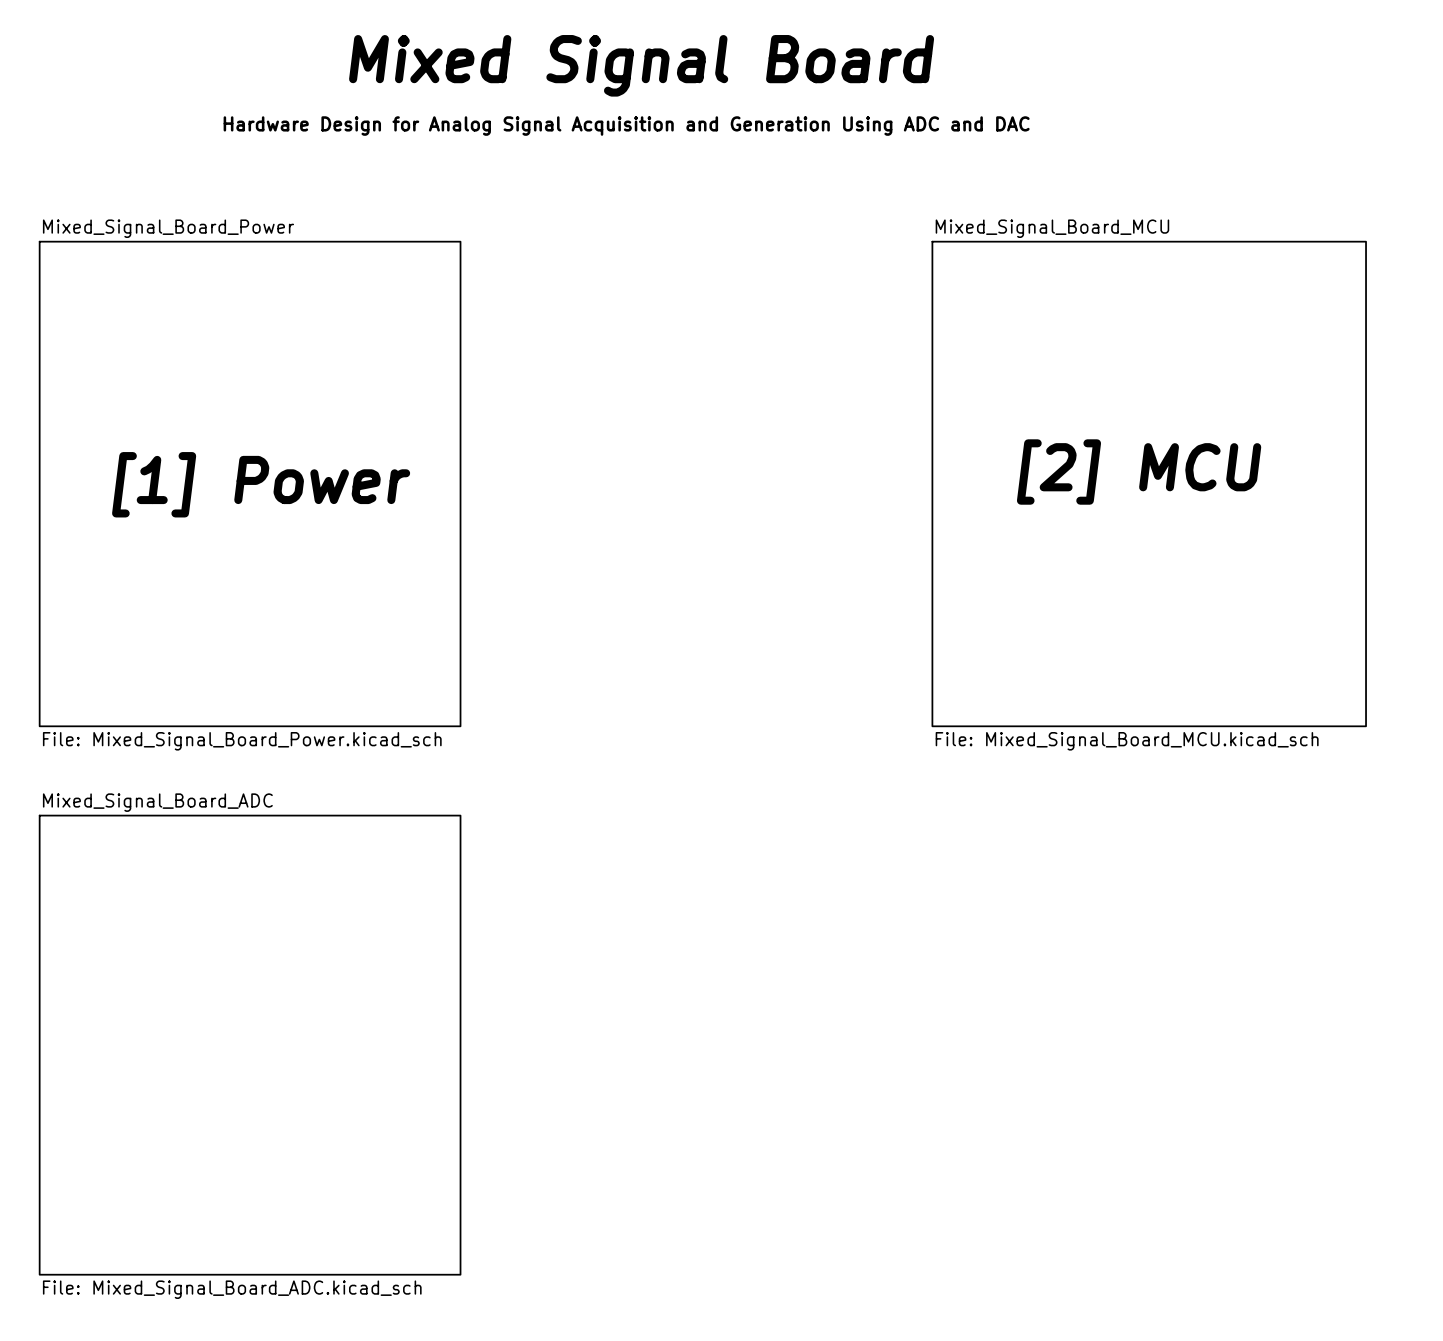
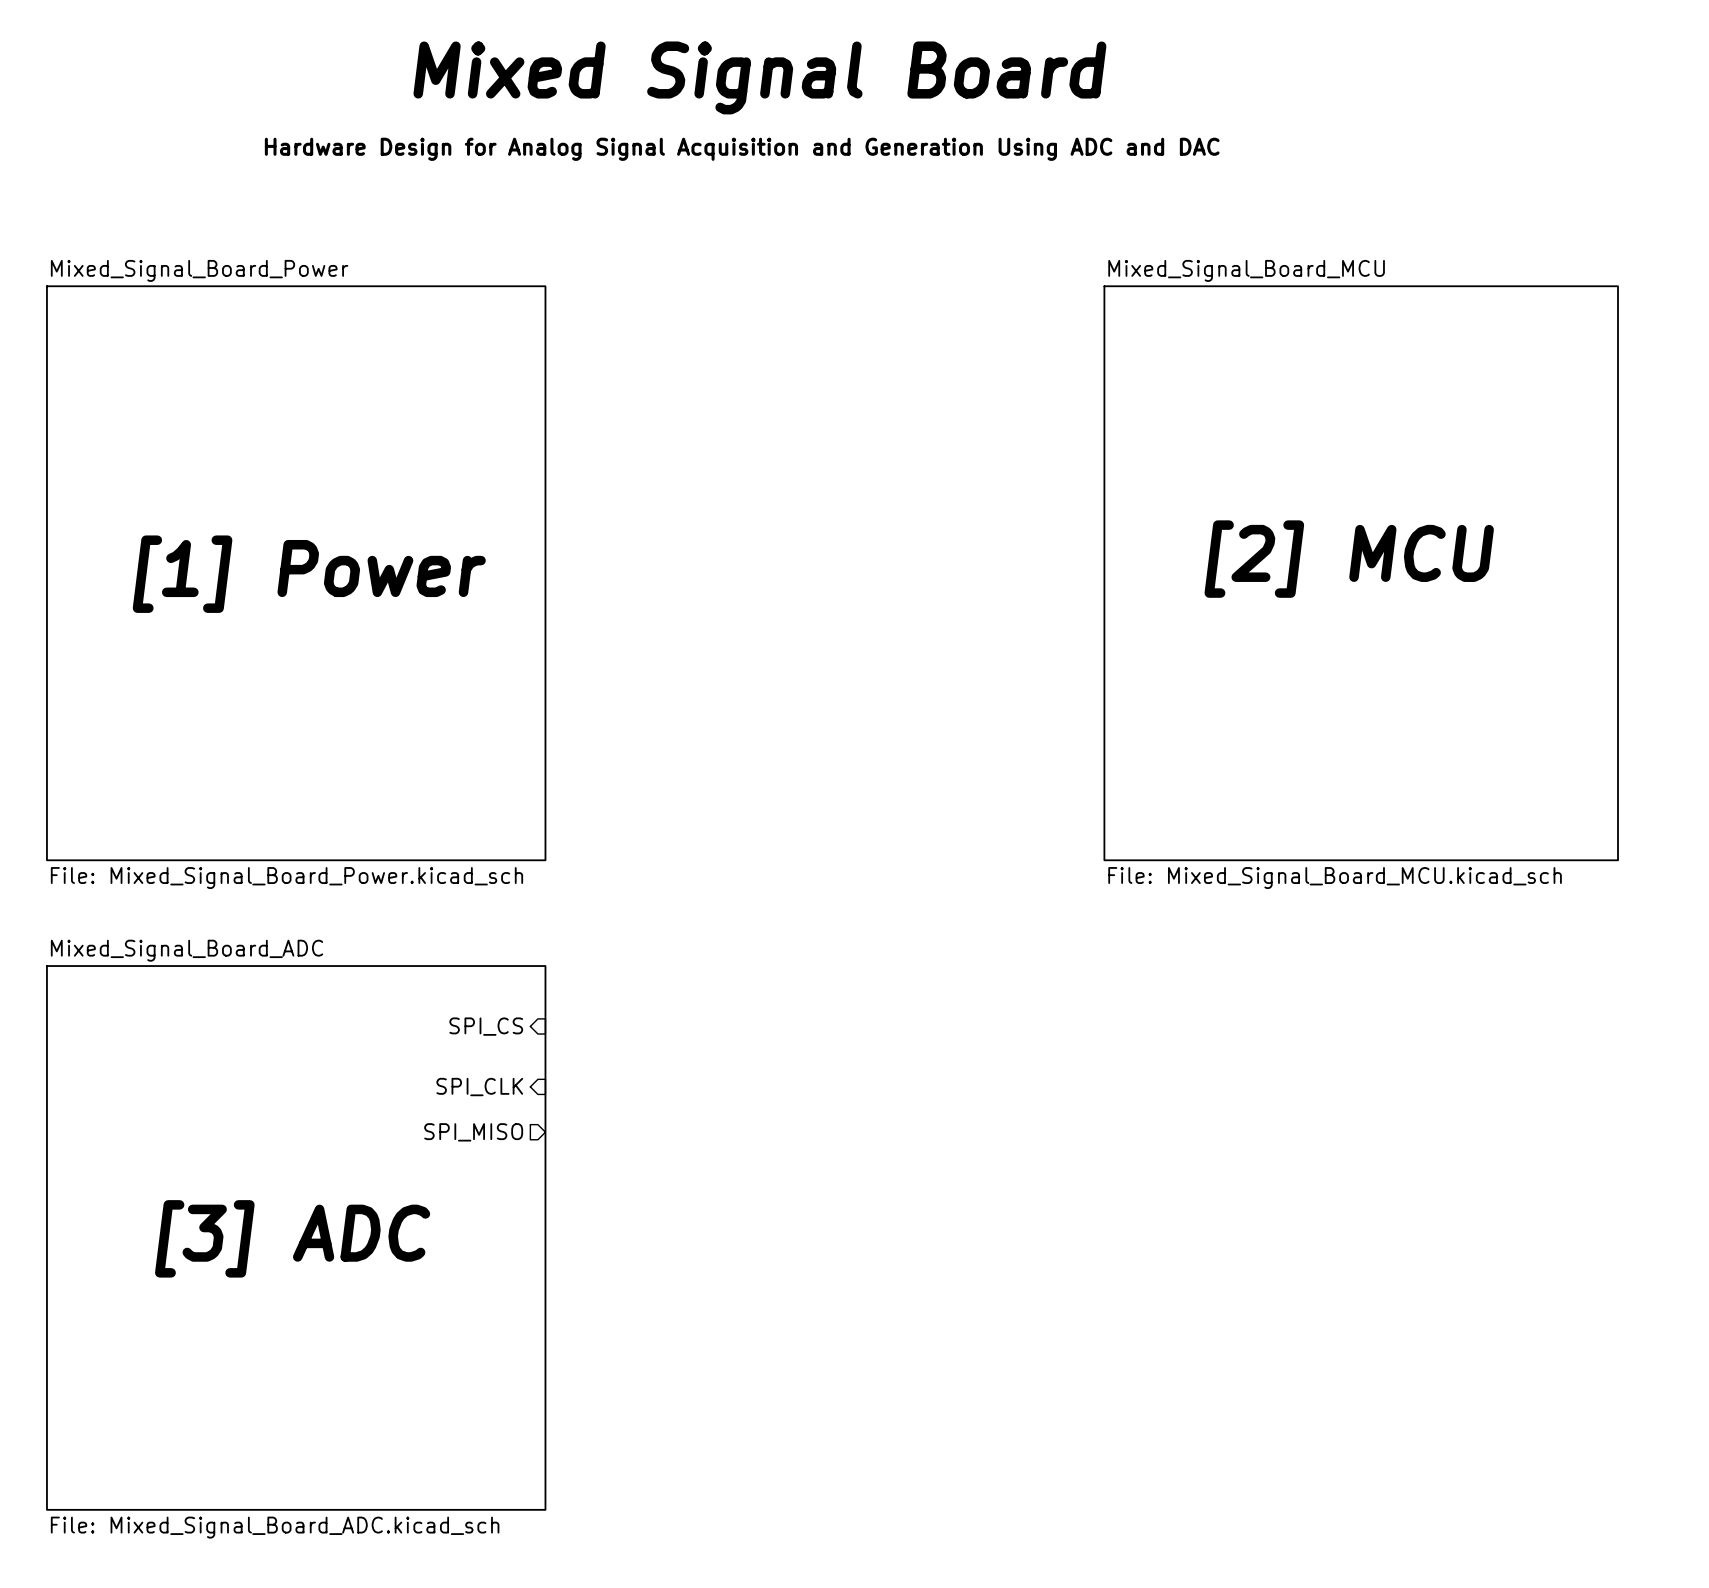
sheet pin: none -> SPI_CS (486, 1026)
sheet pin: none -> SPI_CLK (479, 1087)
sheet pin: none -> SPI_MISO (473, 1132)
text: none -> [3] ADC (292, 1238)

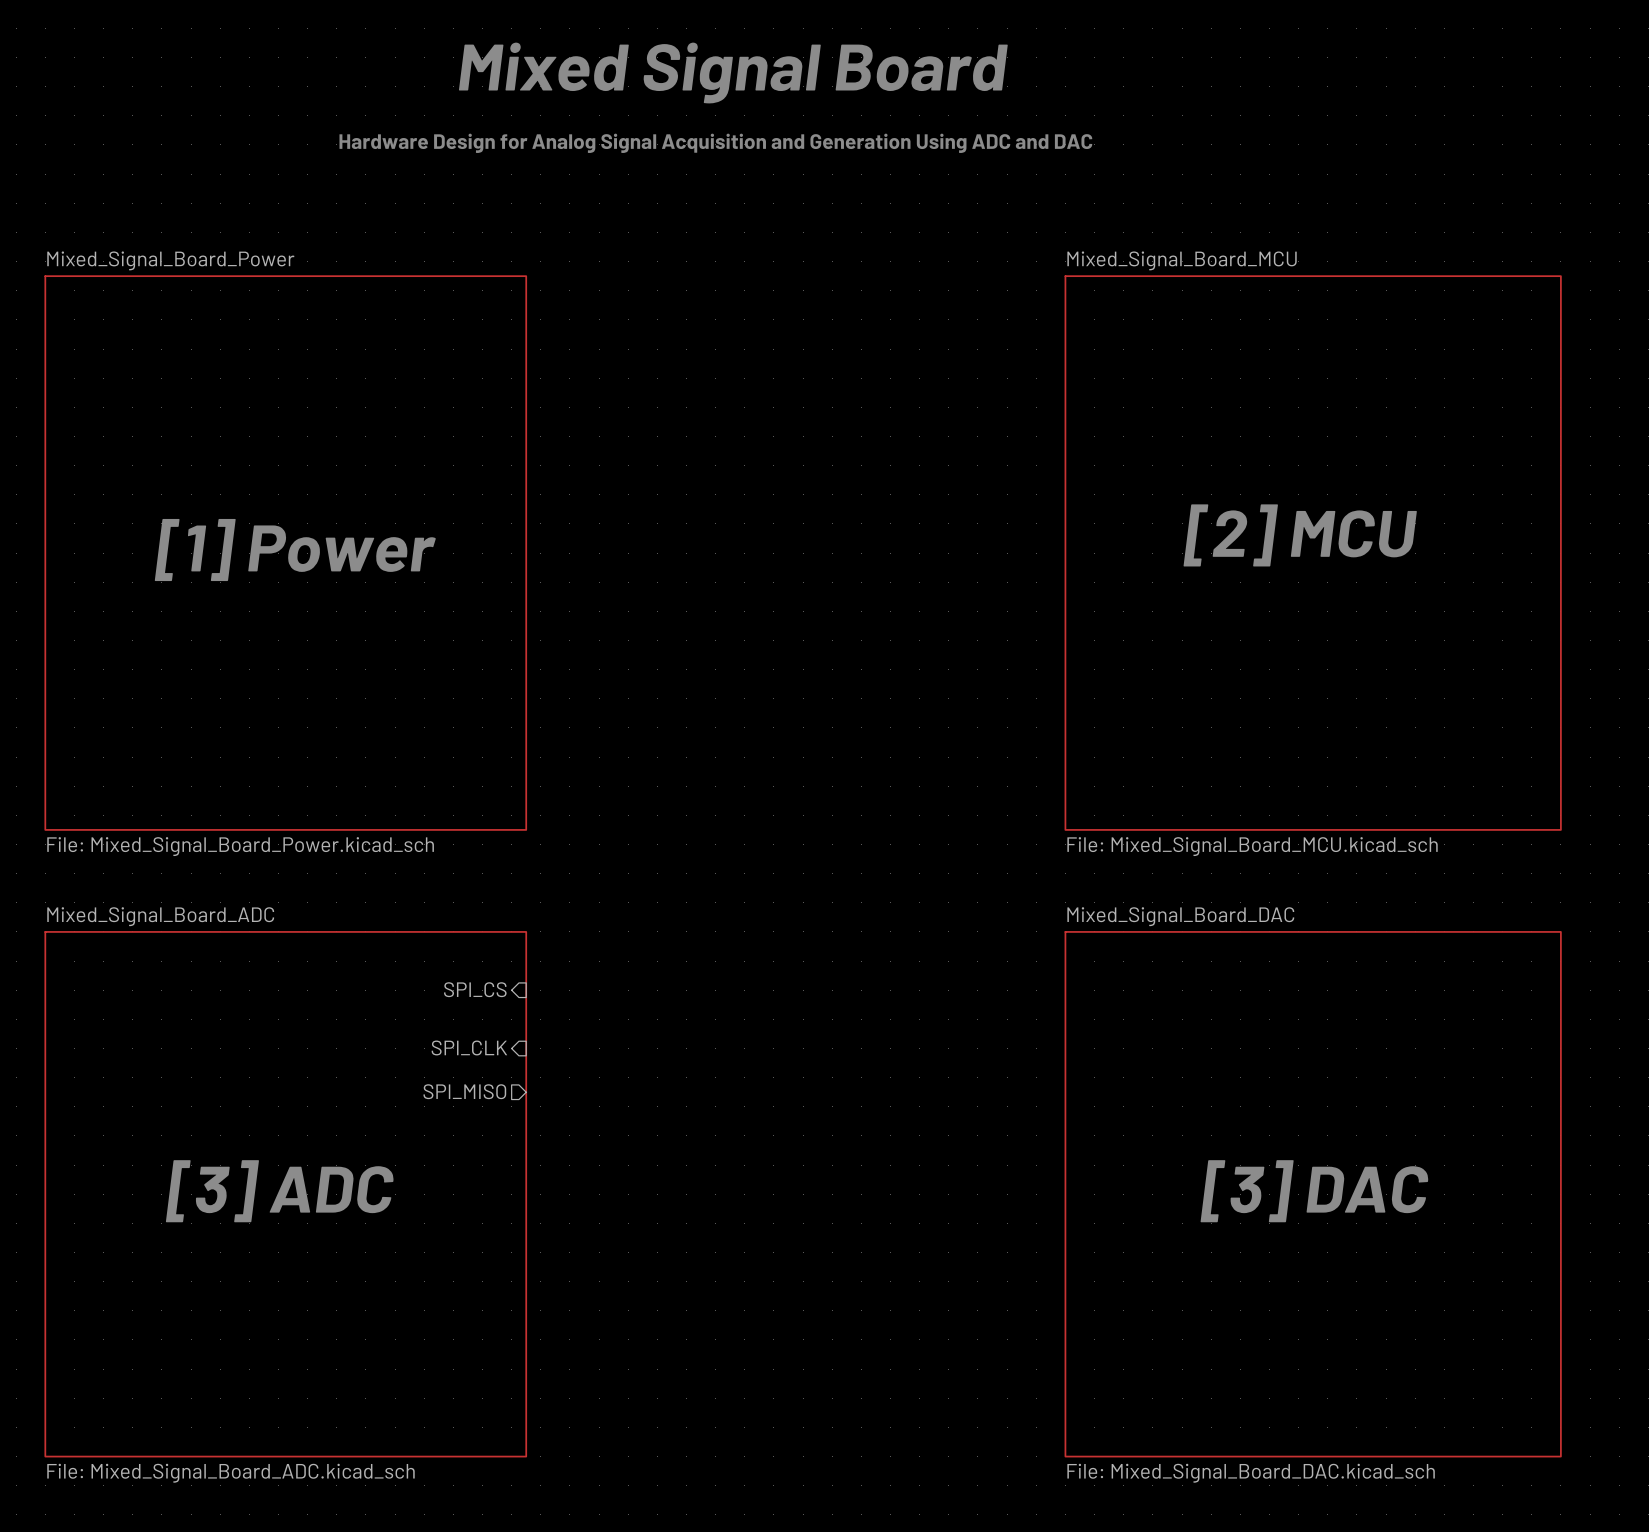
sheet Mixed_Signal_Board_DAC: none -> File: Mixed_Signal_Board_DAC.kicad_sch (1313, 1194)
text: none -> [3] DAC (1314, 1191)

